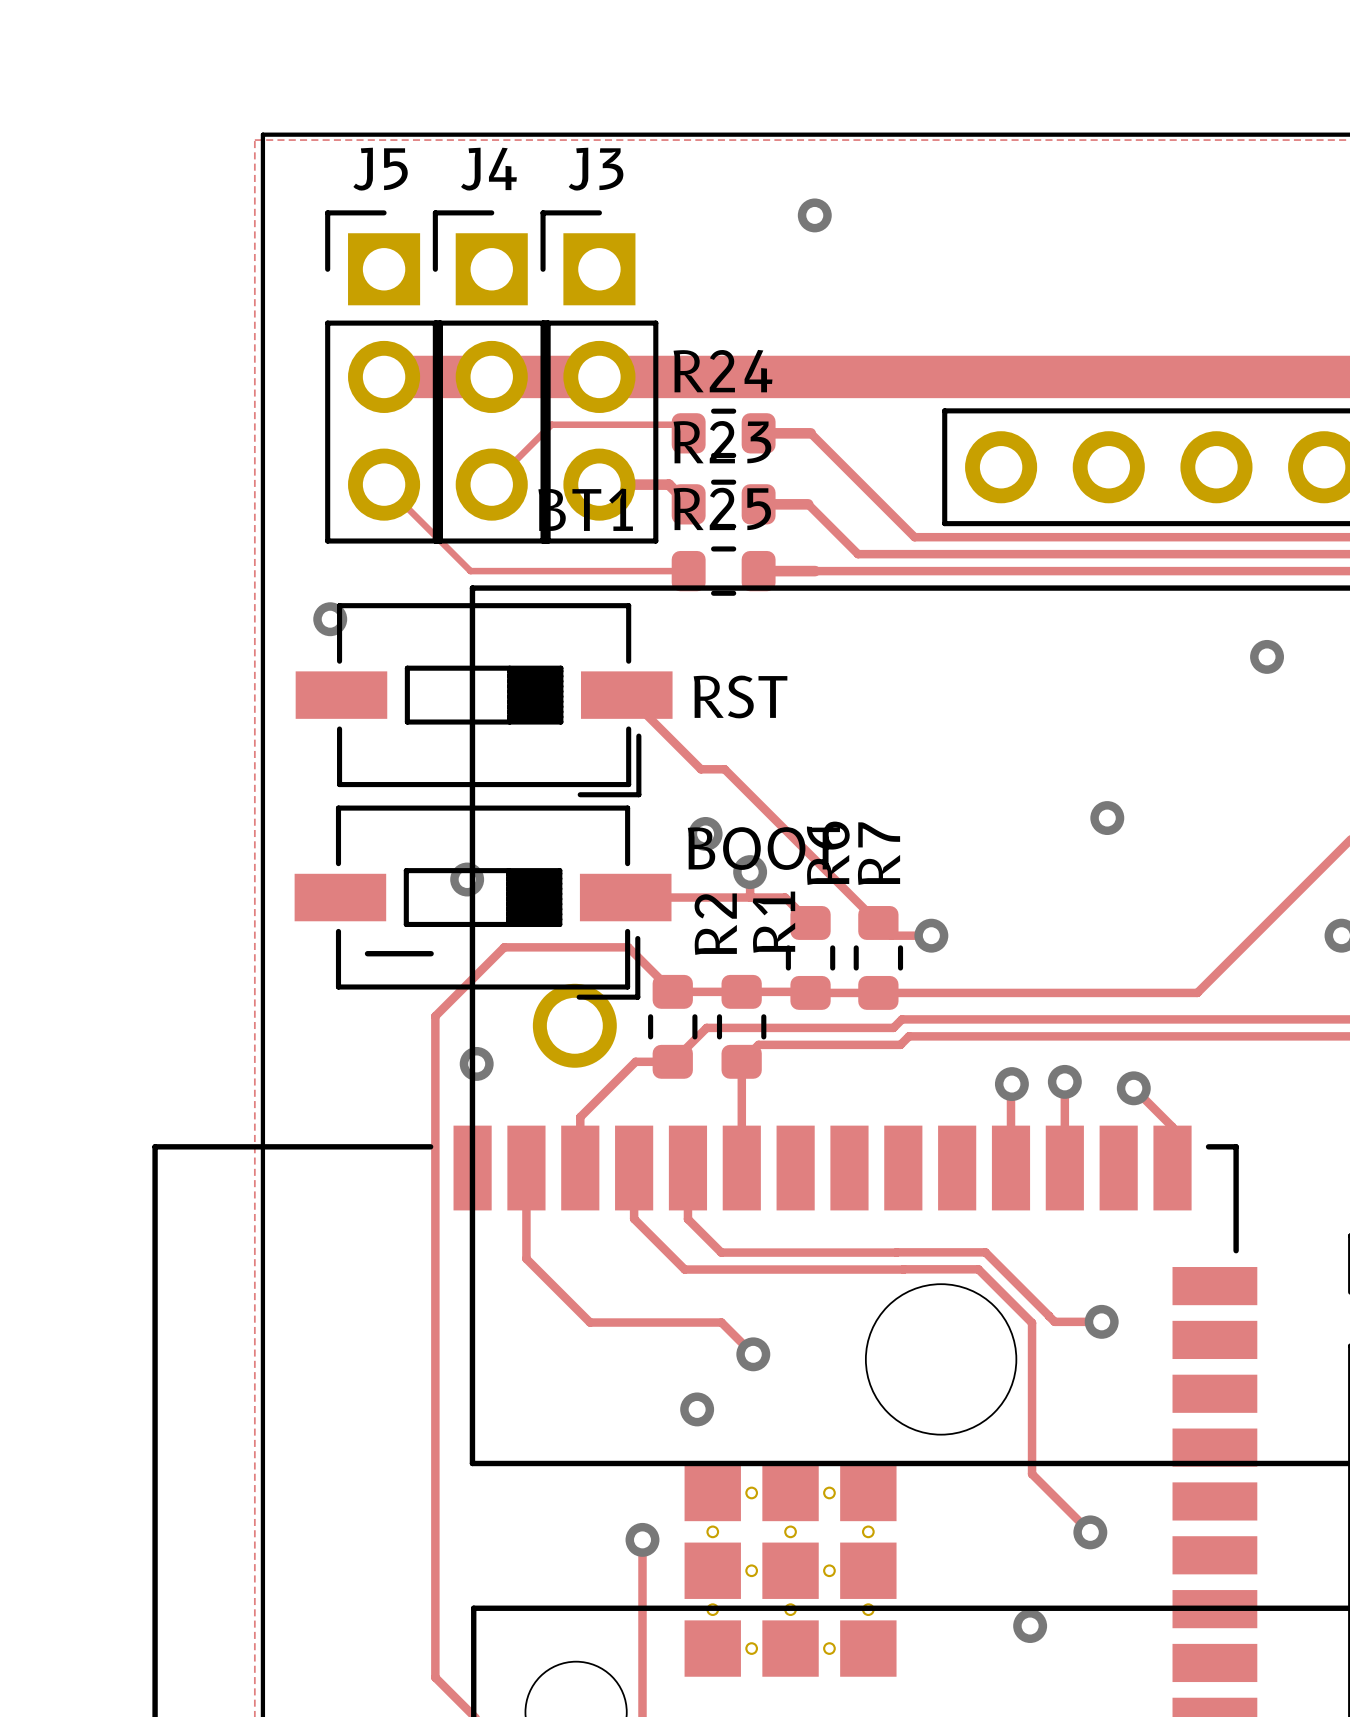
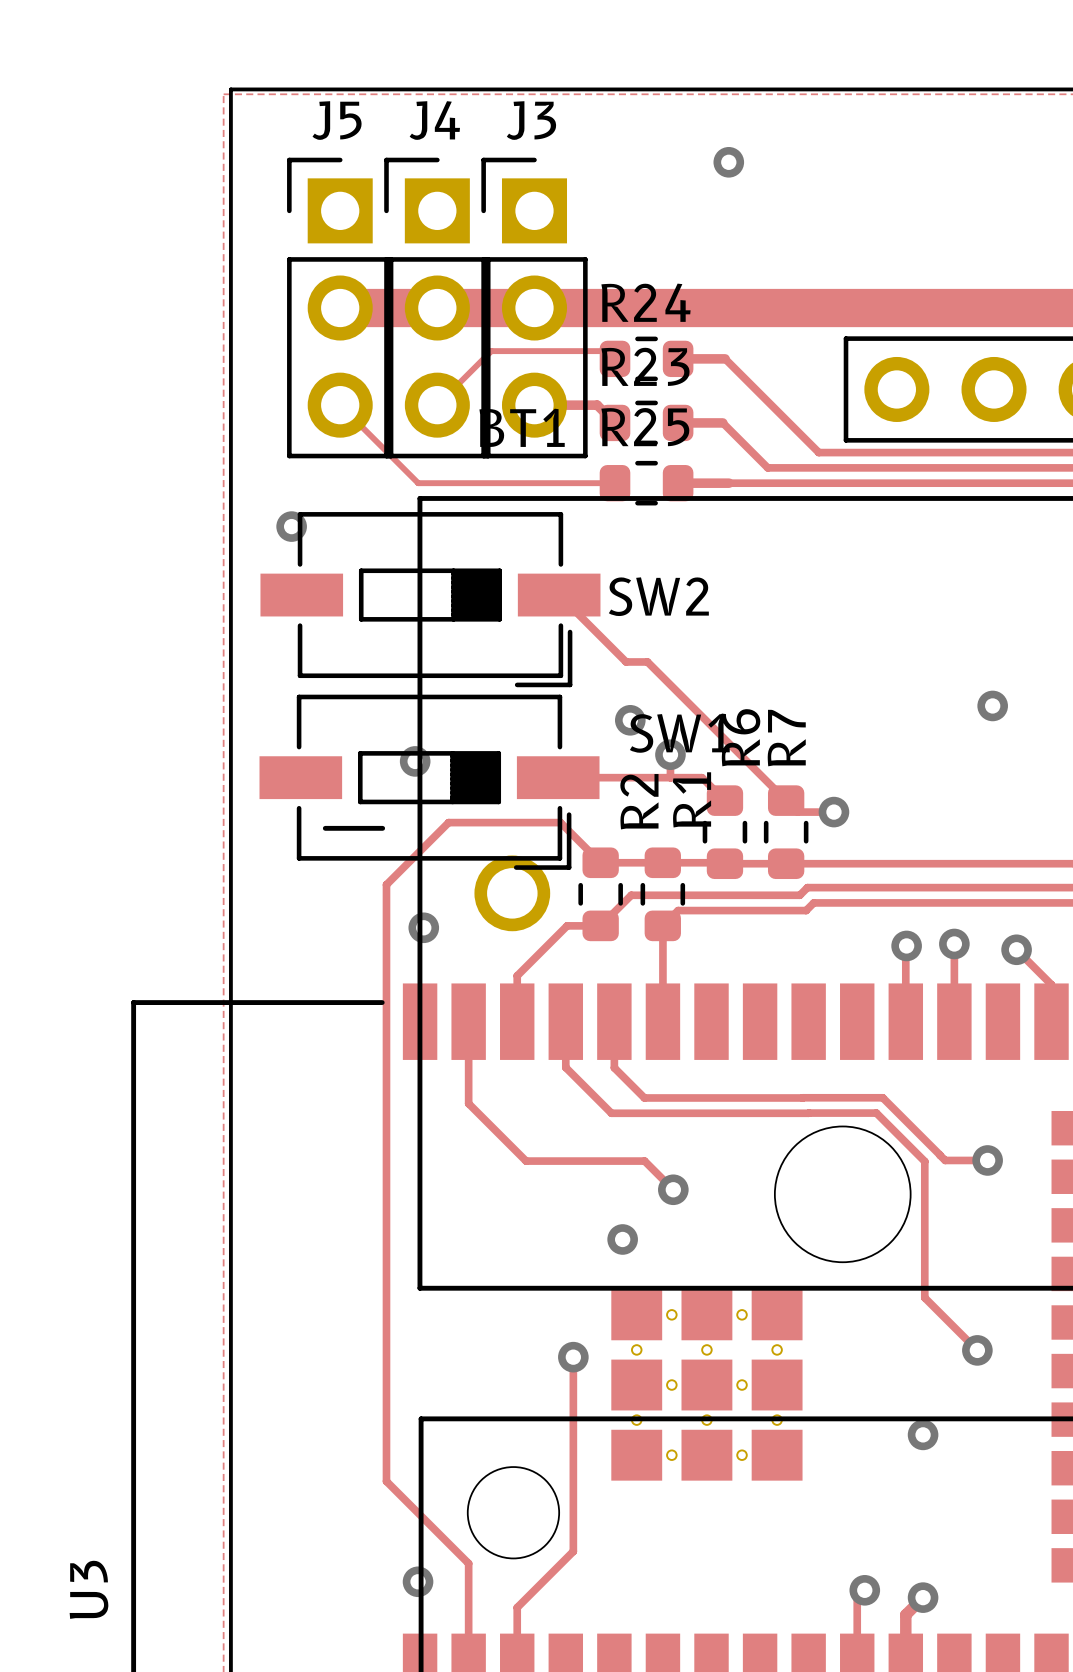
RST name: RST (740, 696) -> SW2 (658, 596)
BOOT name: BOOT (763, 848) -> SW1 (679, 733)

